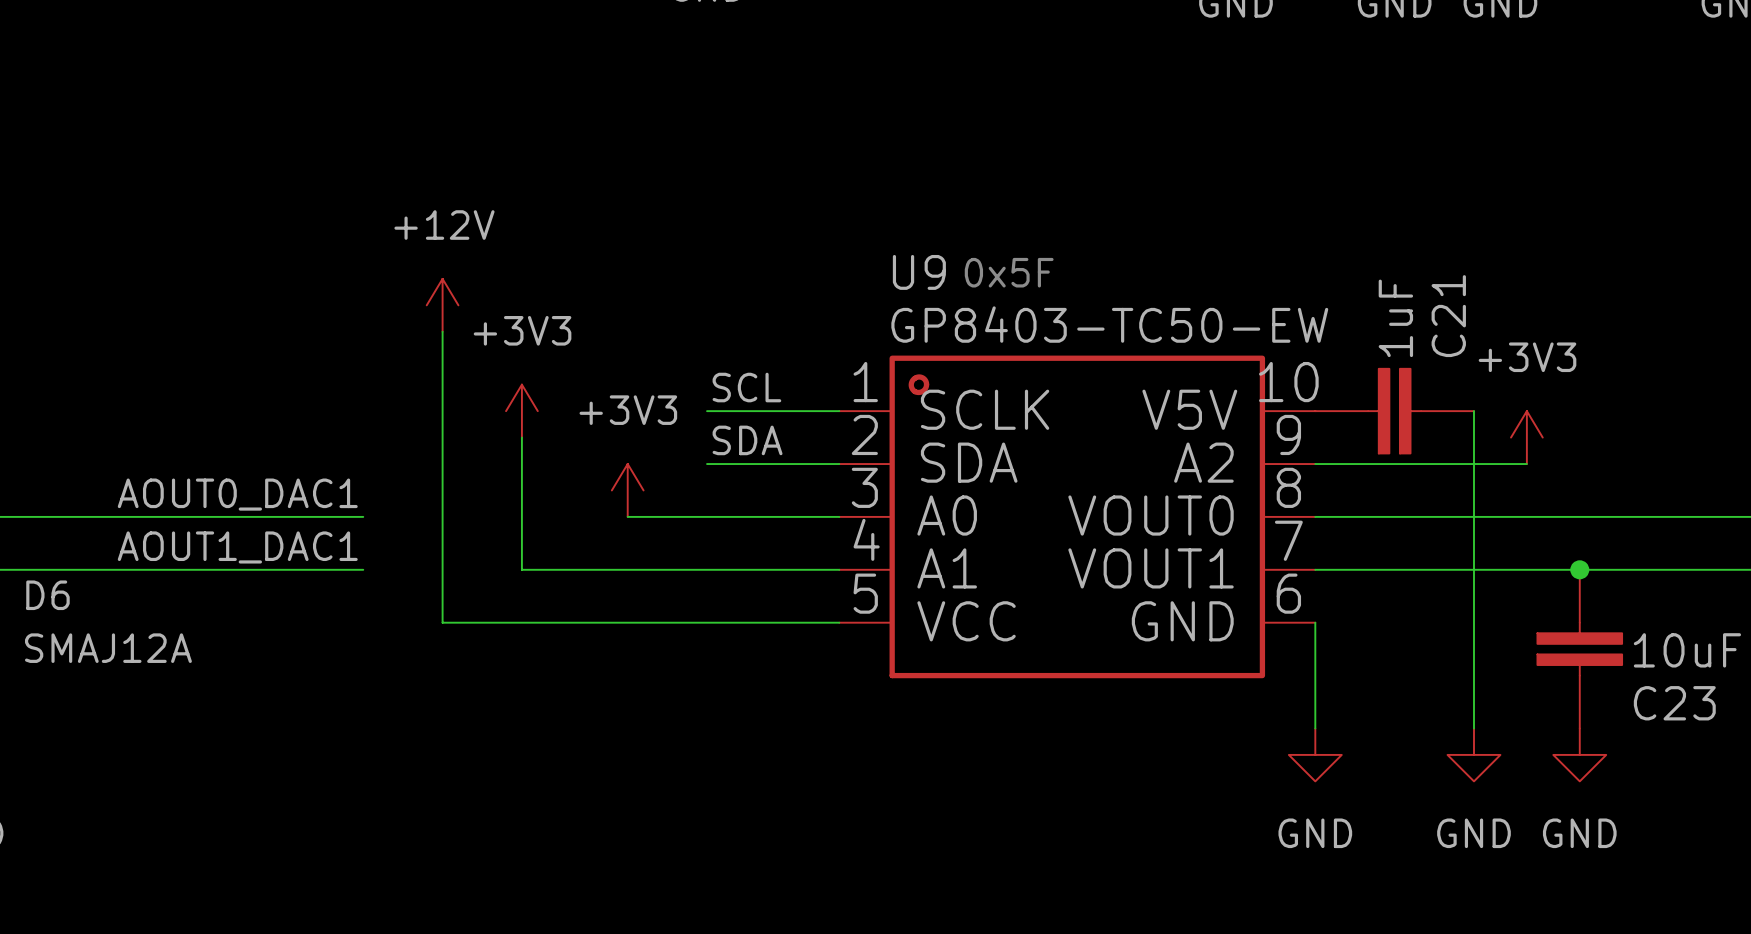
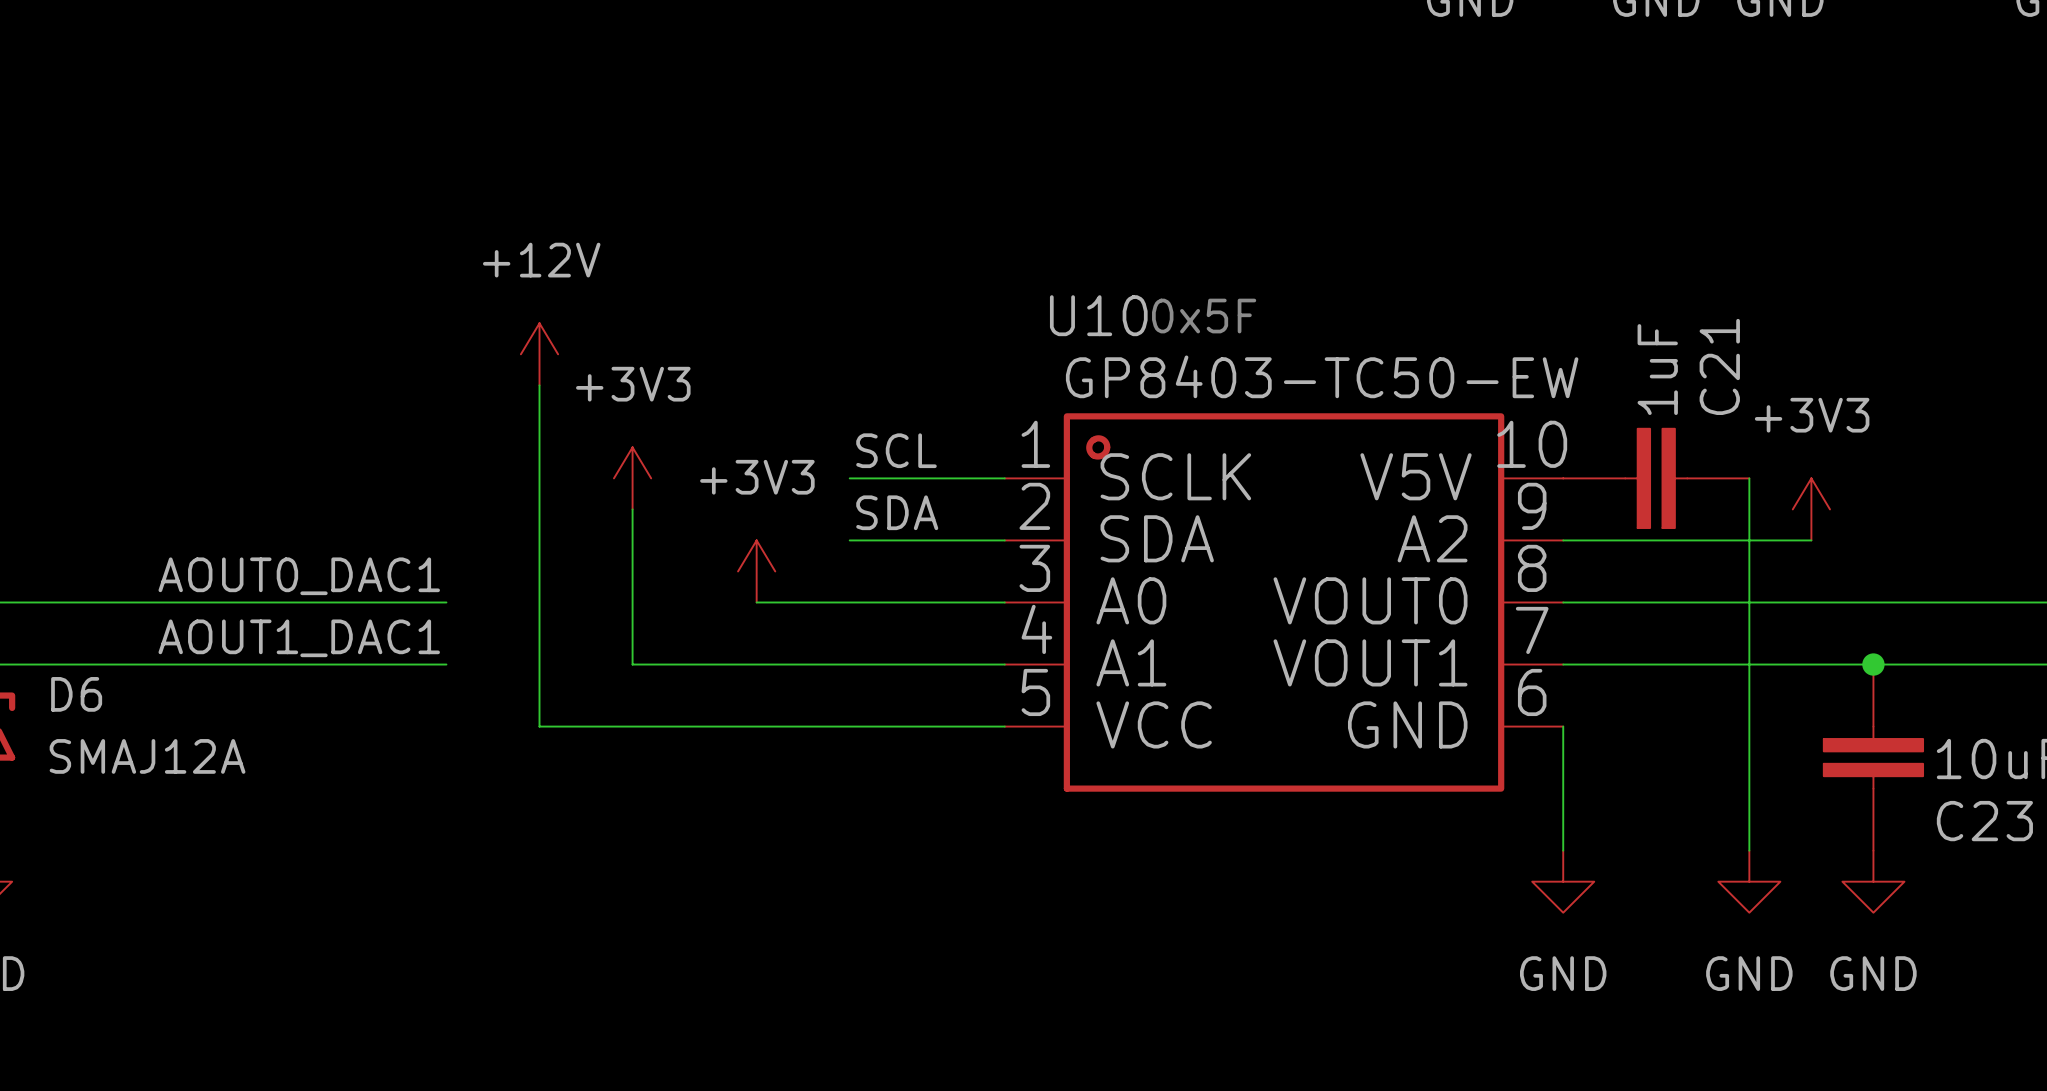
U9 name: U9 (919, 272) -> U10 (1098, 315)

